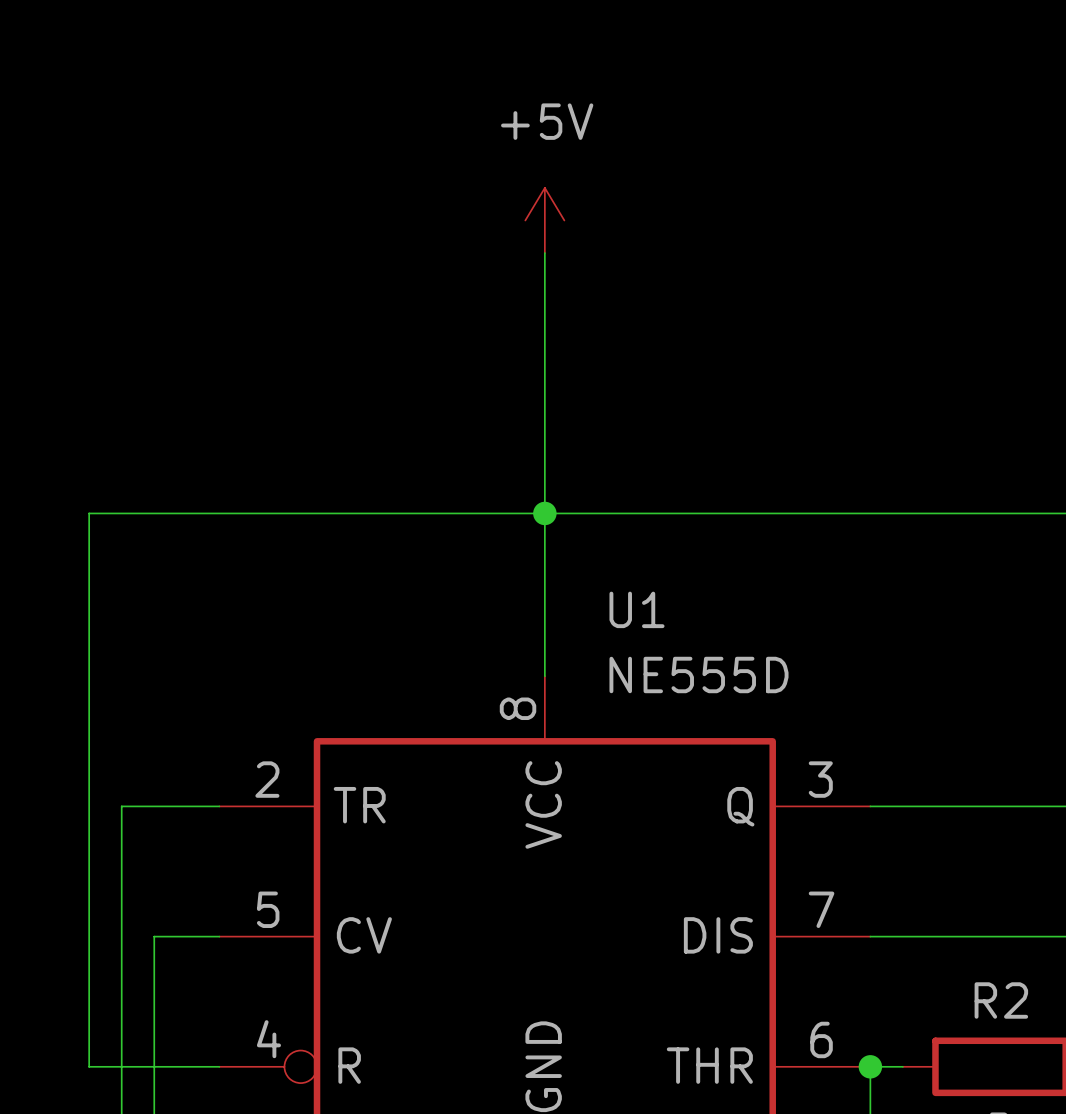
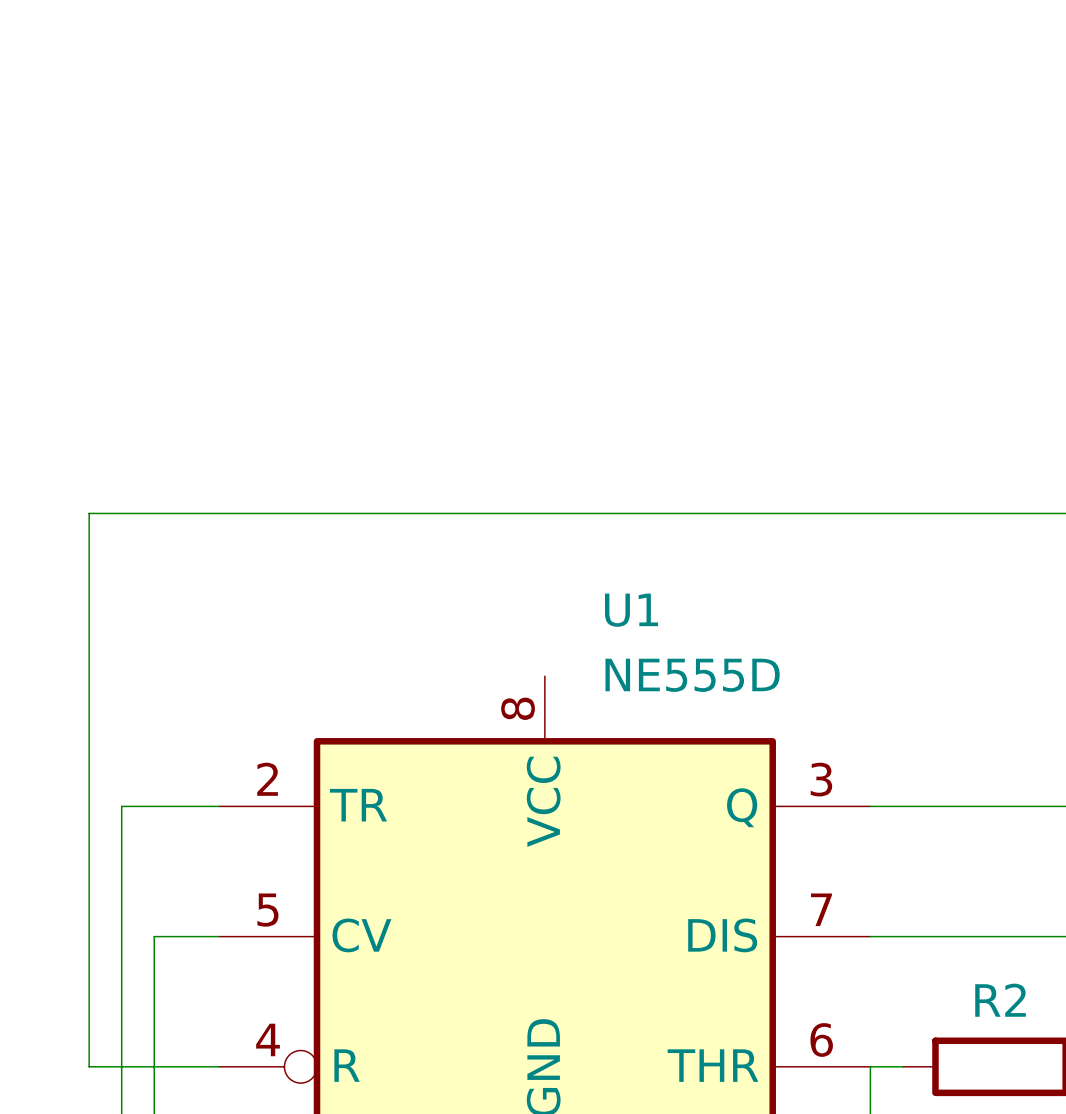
power symbol: +5V (544, 220) -> none
wire: (544, 253) (544, 676) -> none
junction: (544, 513) -> none
junction: (870, 1066) -> none

